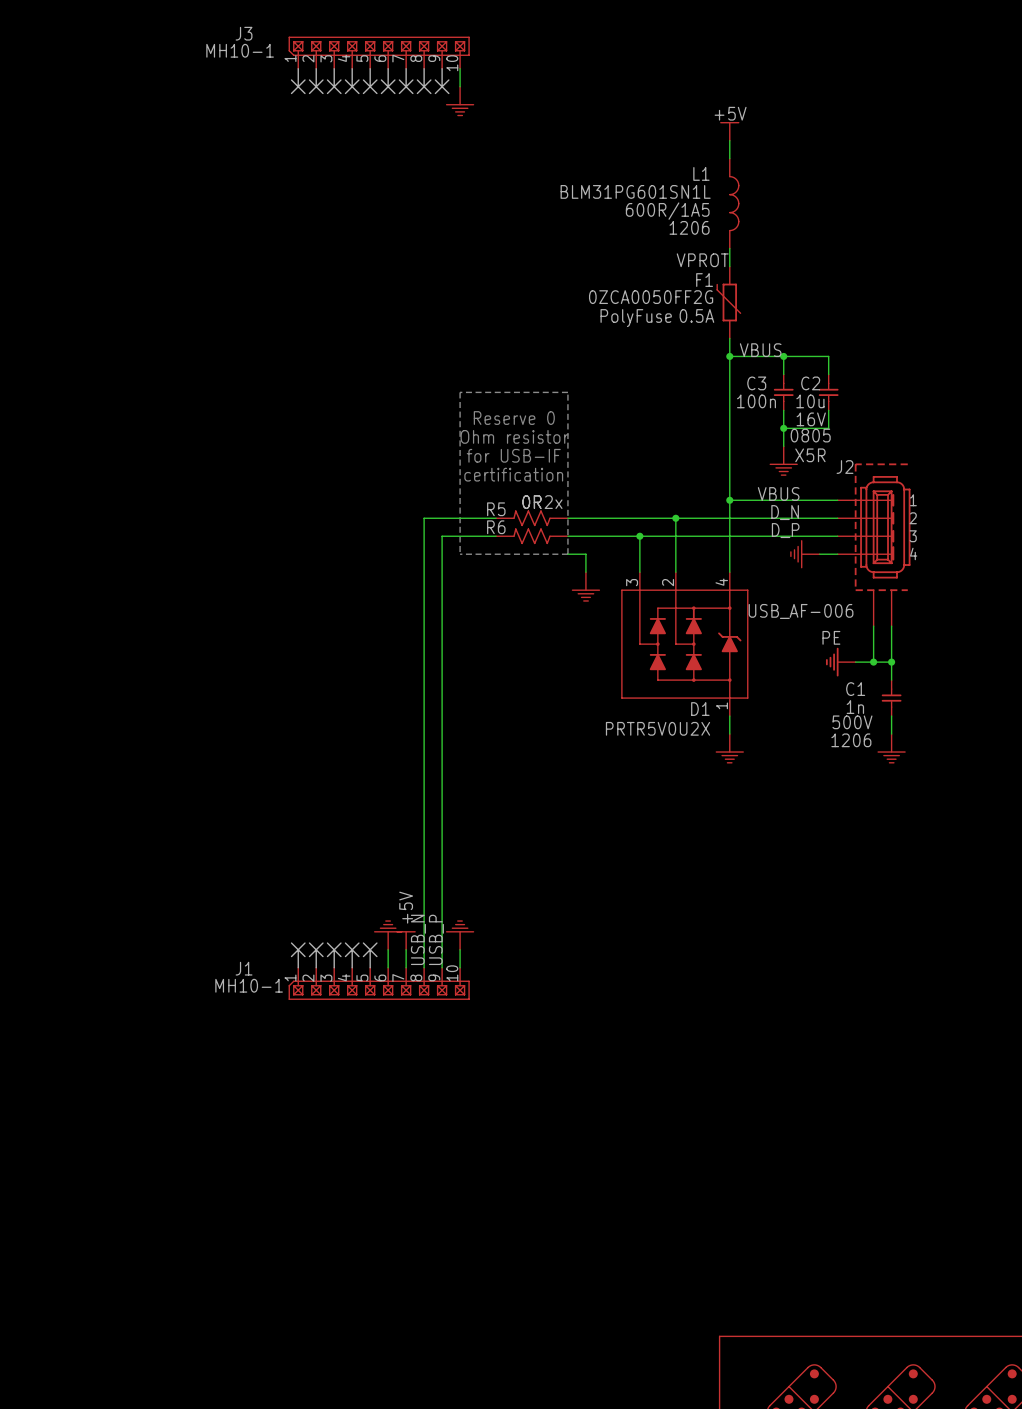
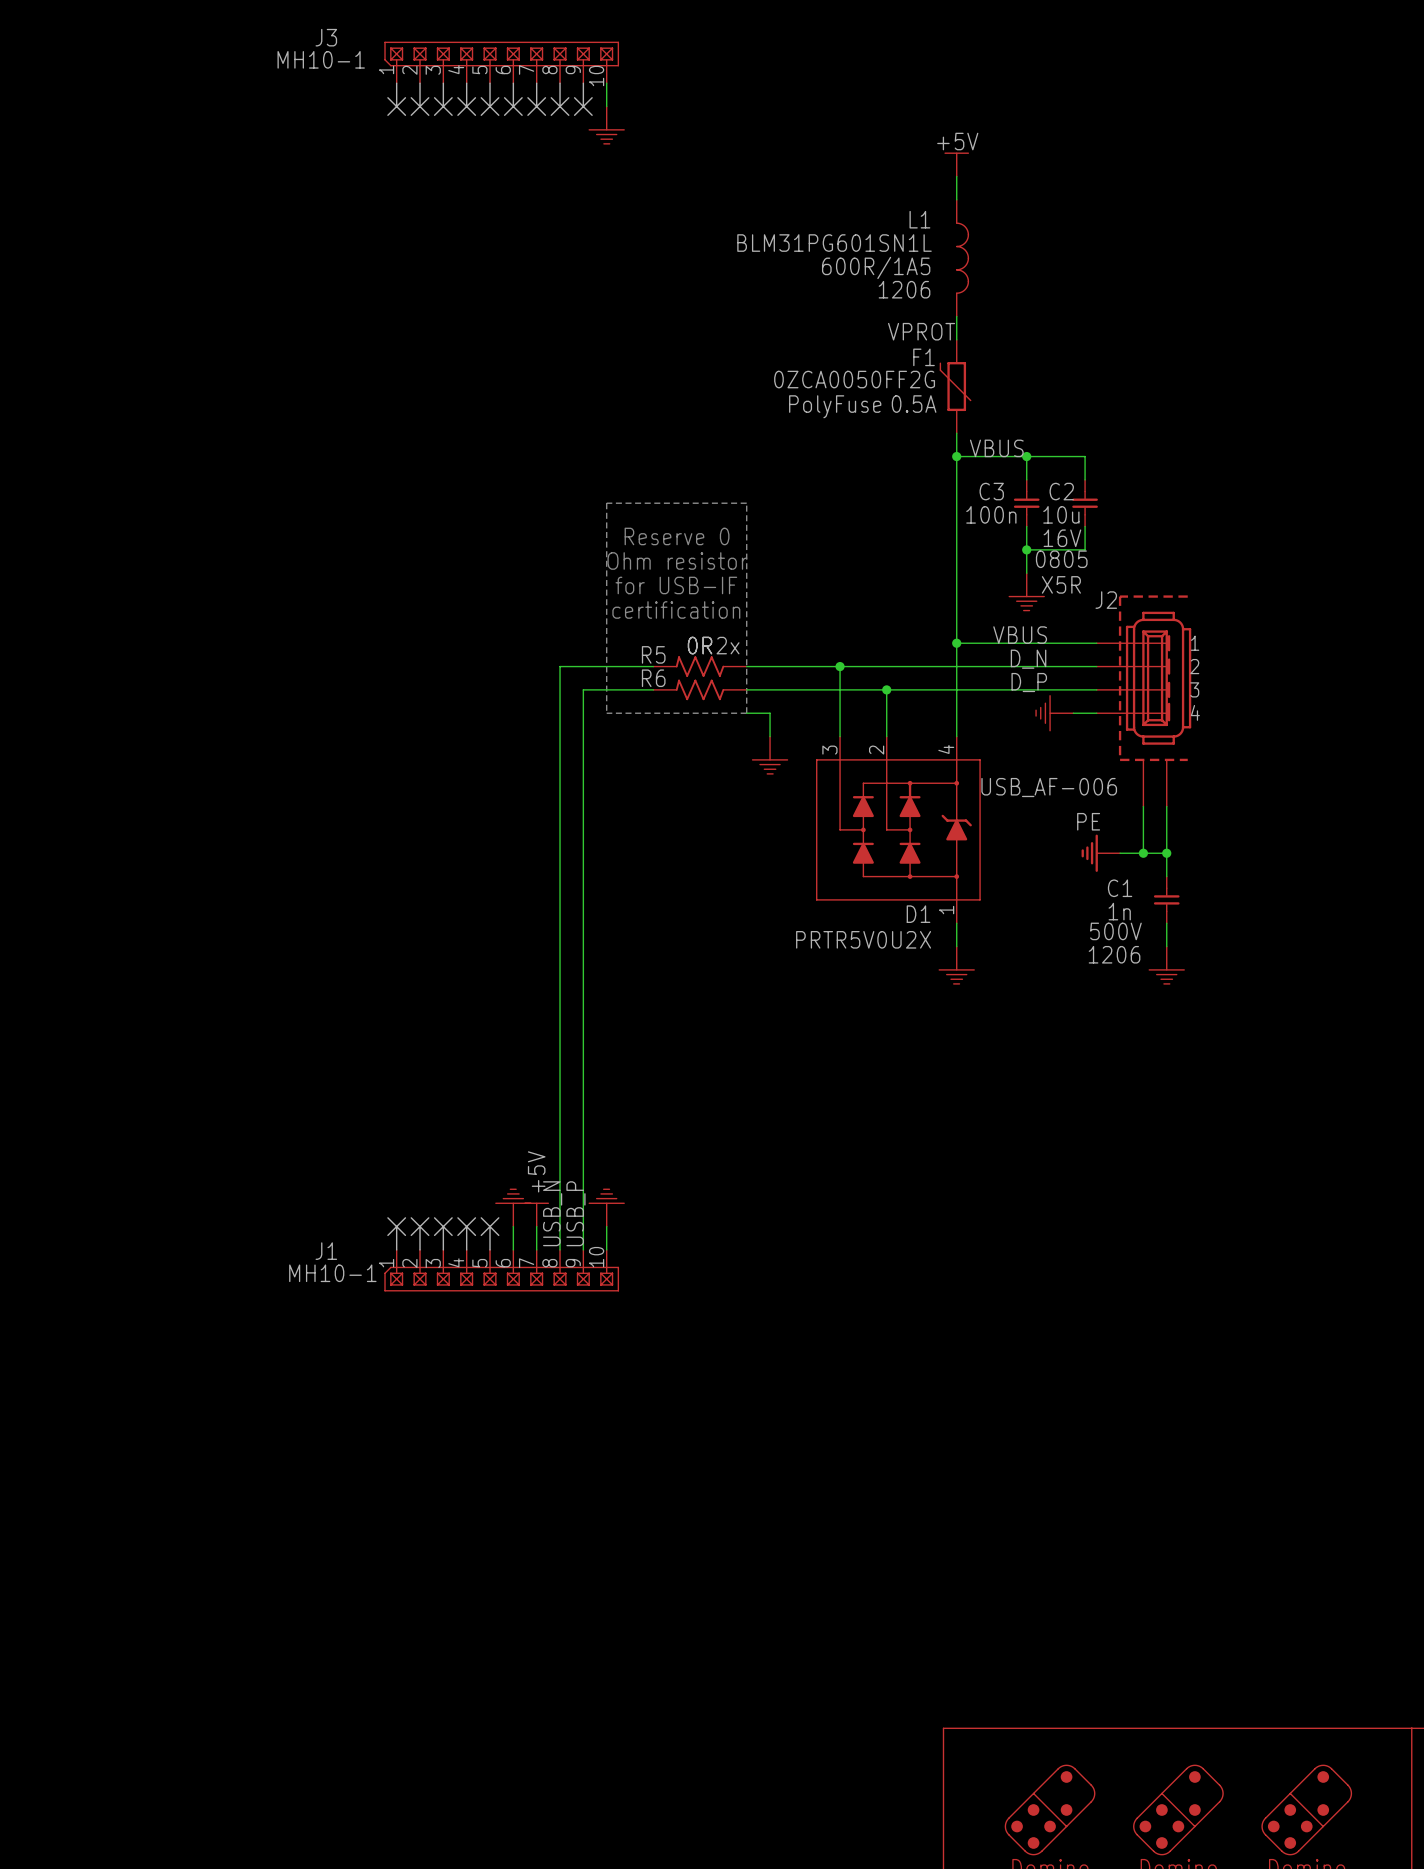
junction: none -> (840, 666)
wire: (675, 518) (675, 536) -> (840, 666) (840, 689)
junction: (675, 518) -> none
junction: (639, 536) -> none
junction: none -> (886, 689)

